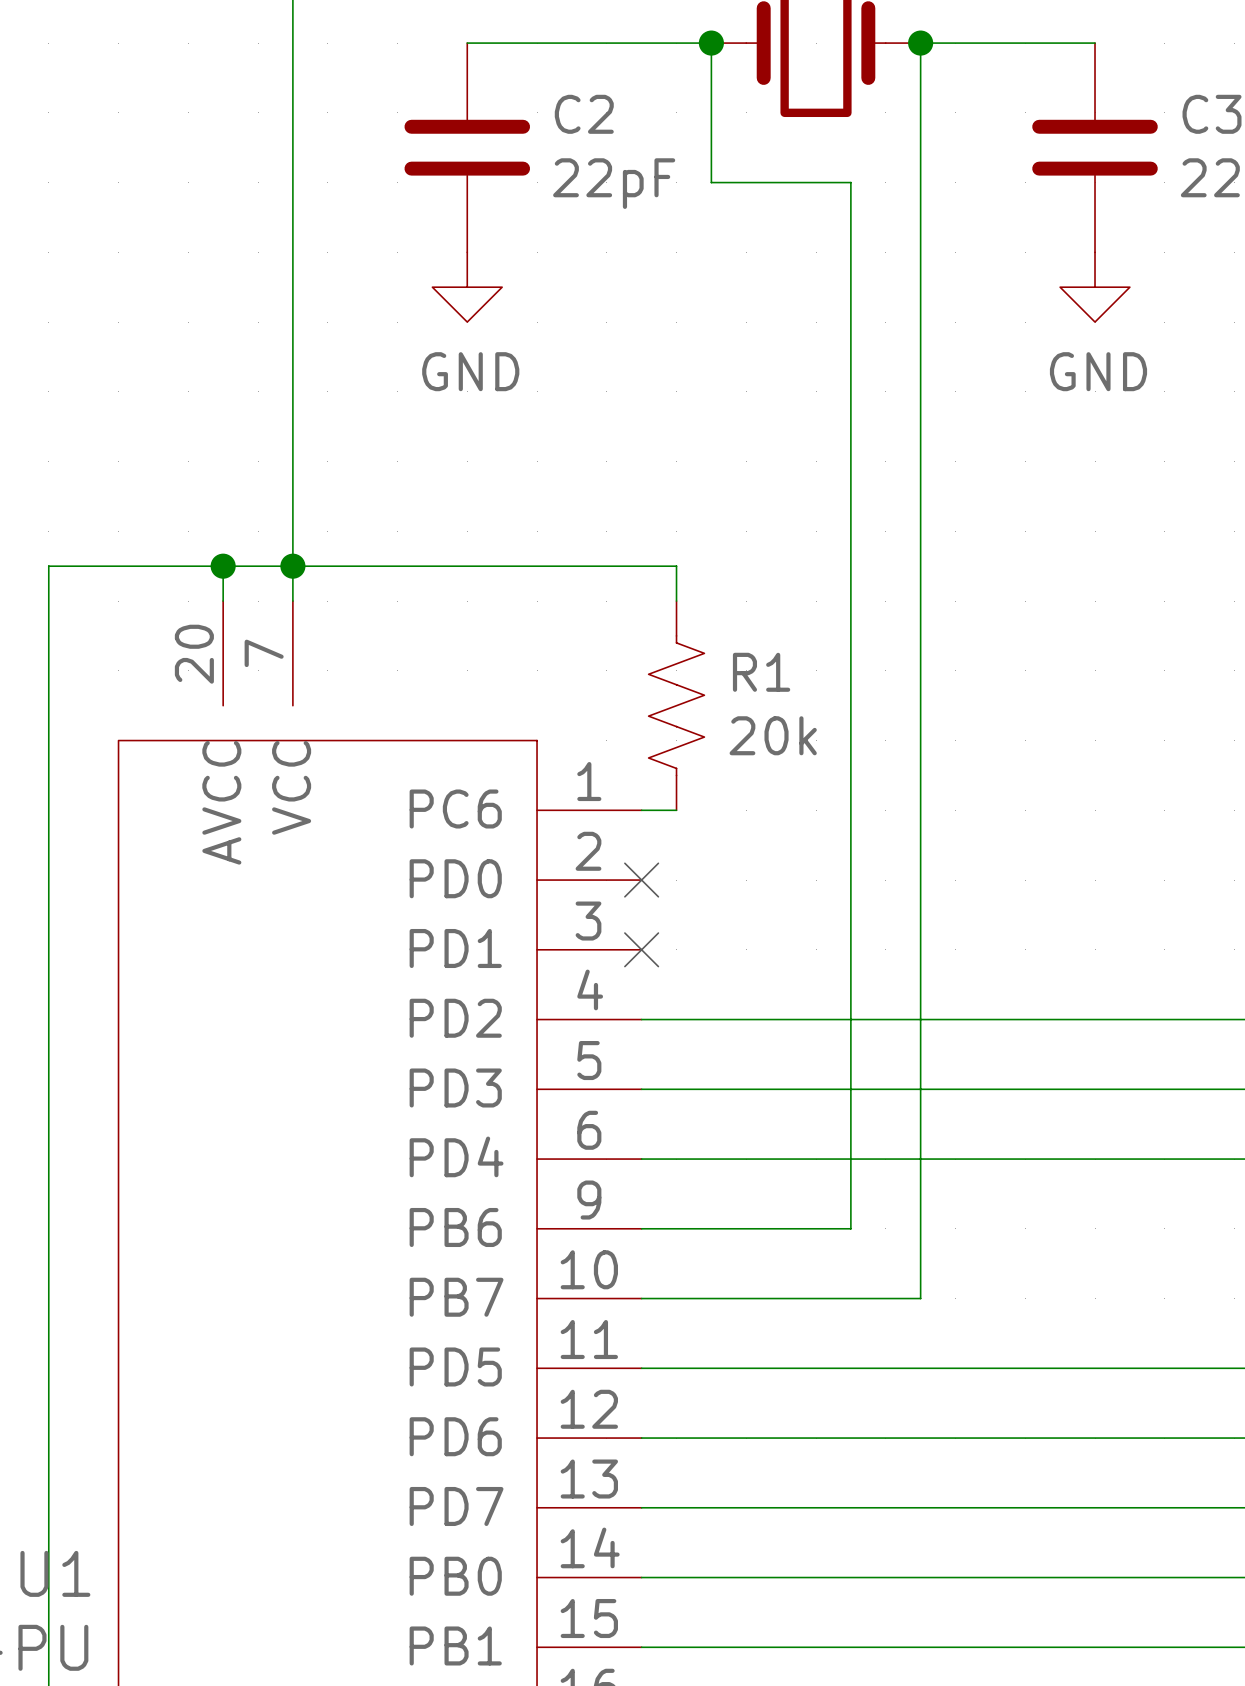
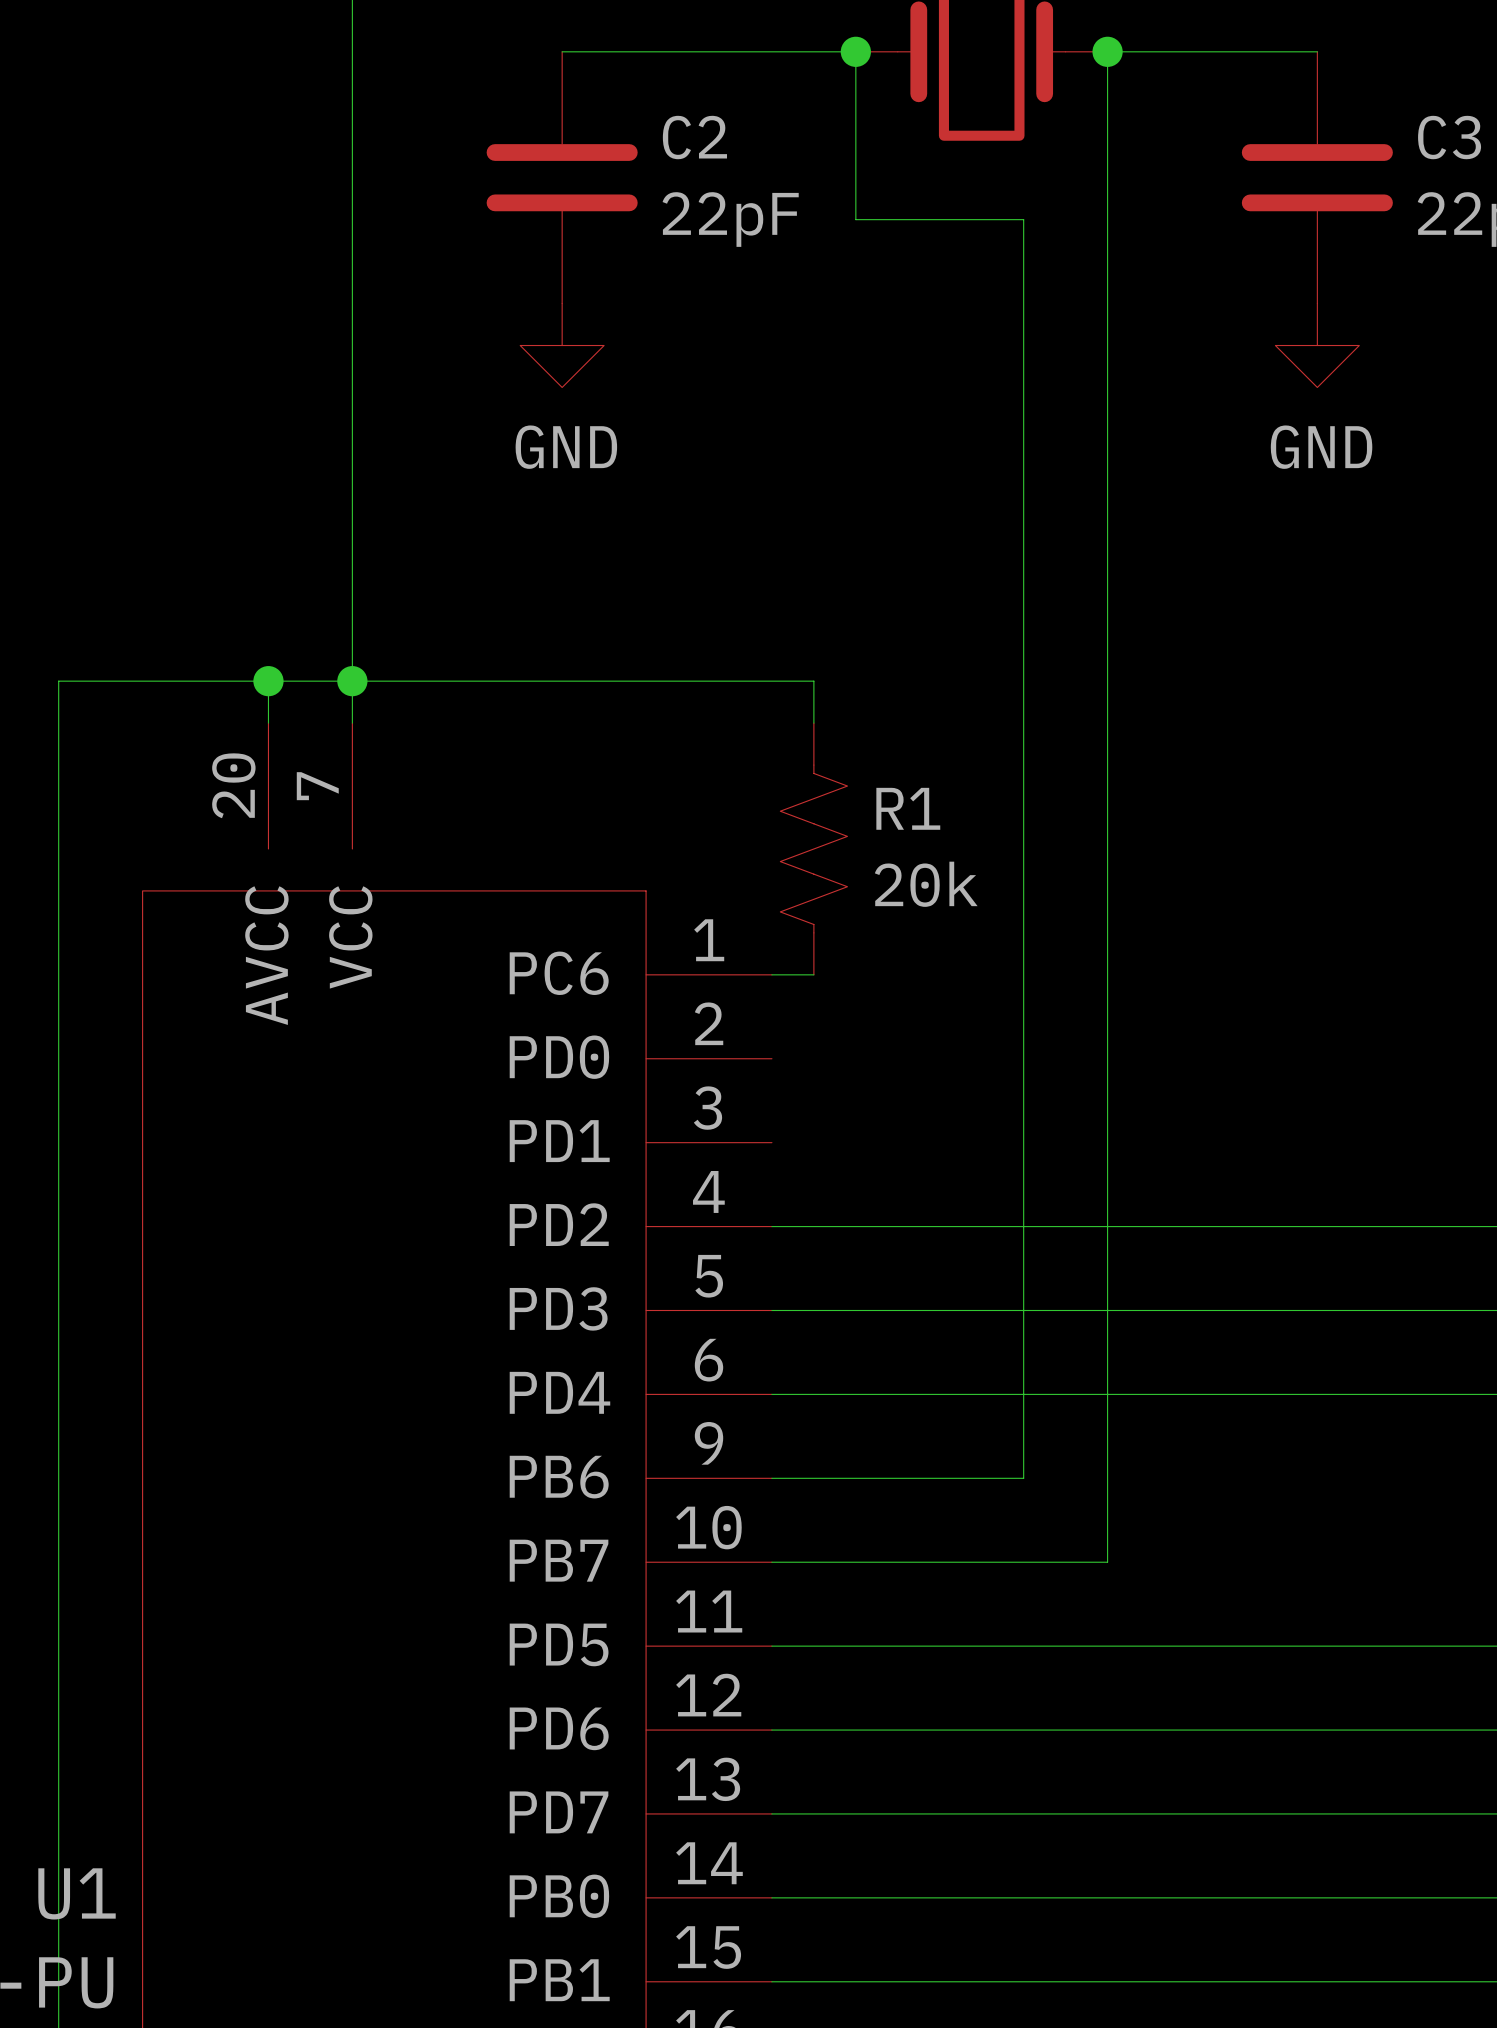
no-connect mark: (641, 880) -> none
no-connect mark: (641, 949) -> none

